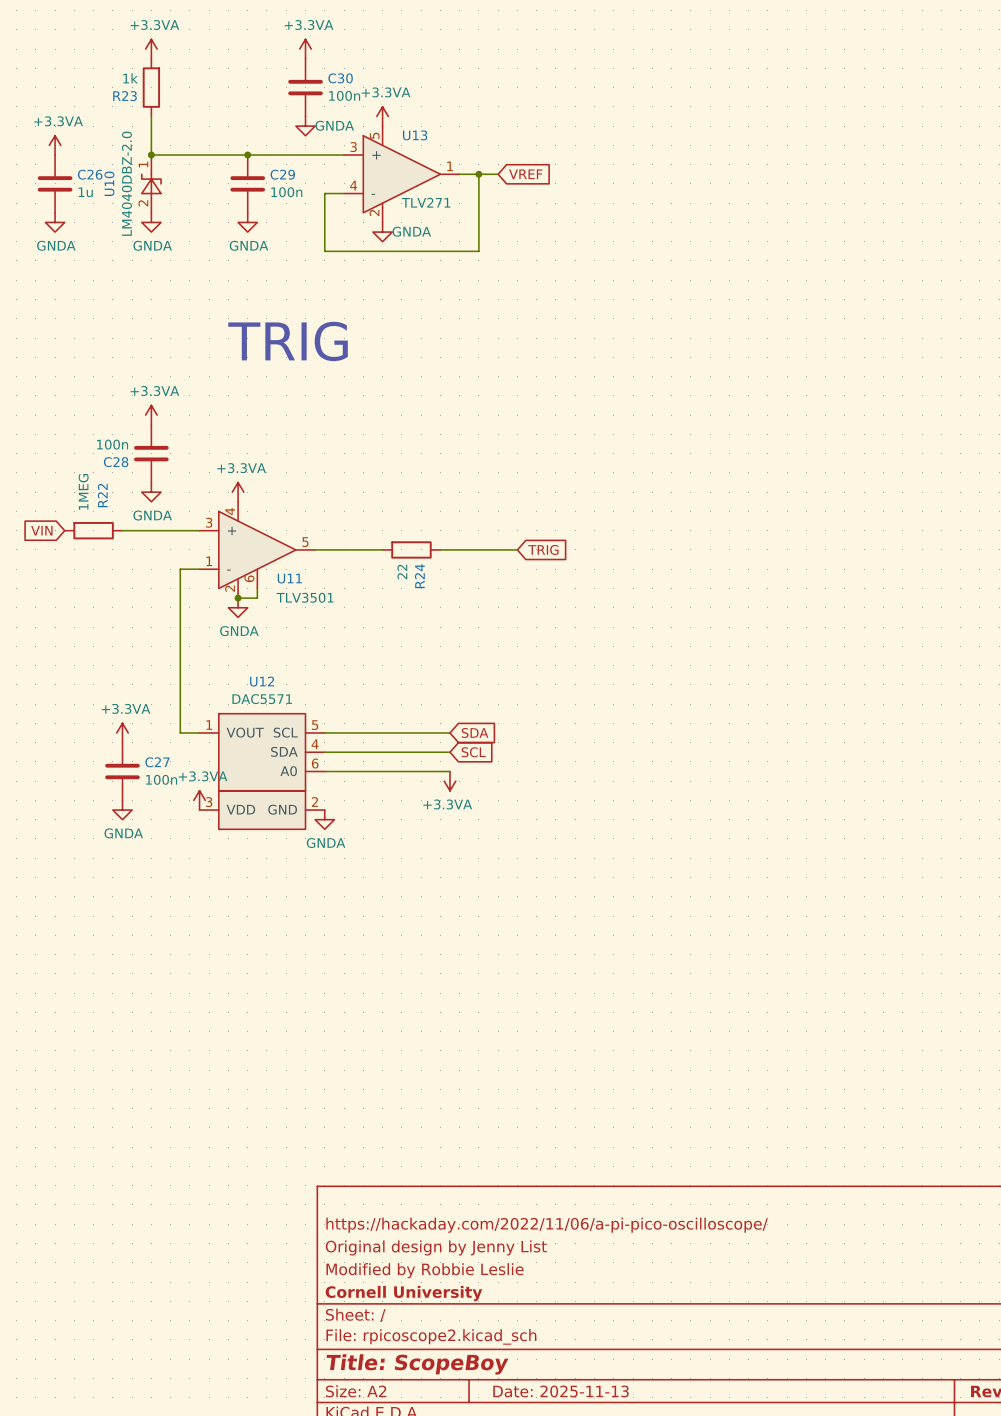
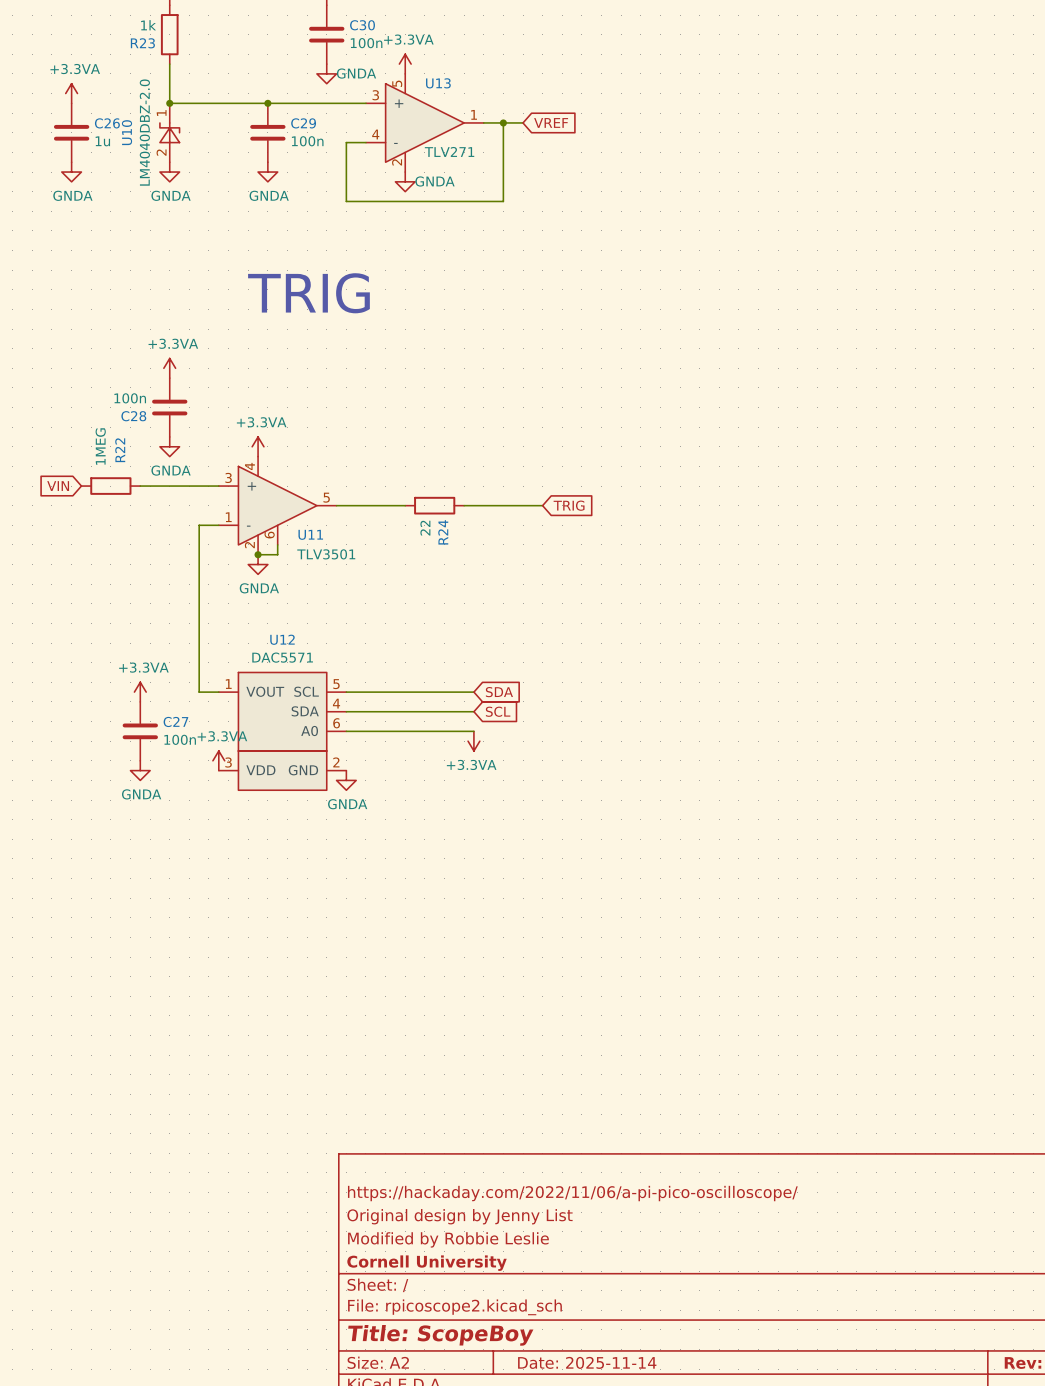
title block: Date: 2025-11-13 (561, 1391) -> Date: 2025-11-14 (587, 1362)

